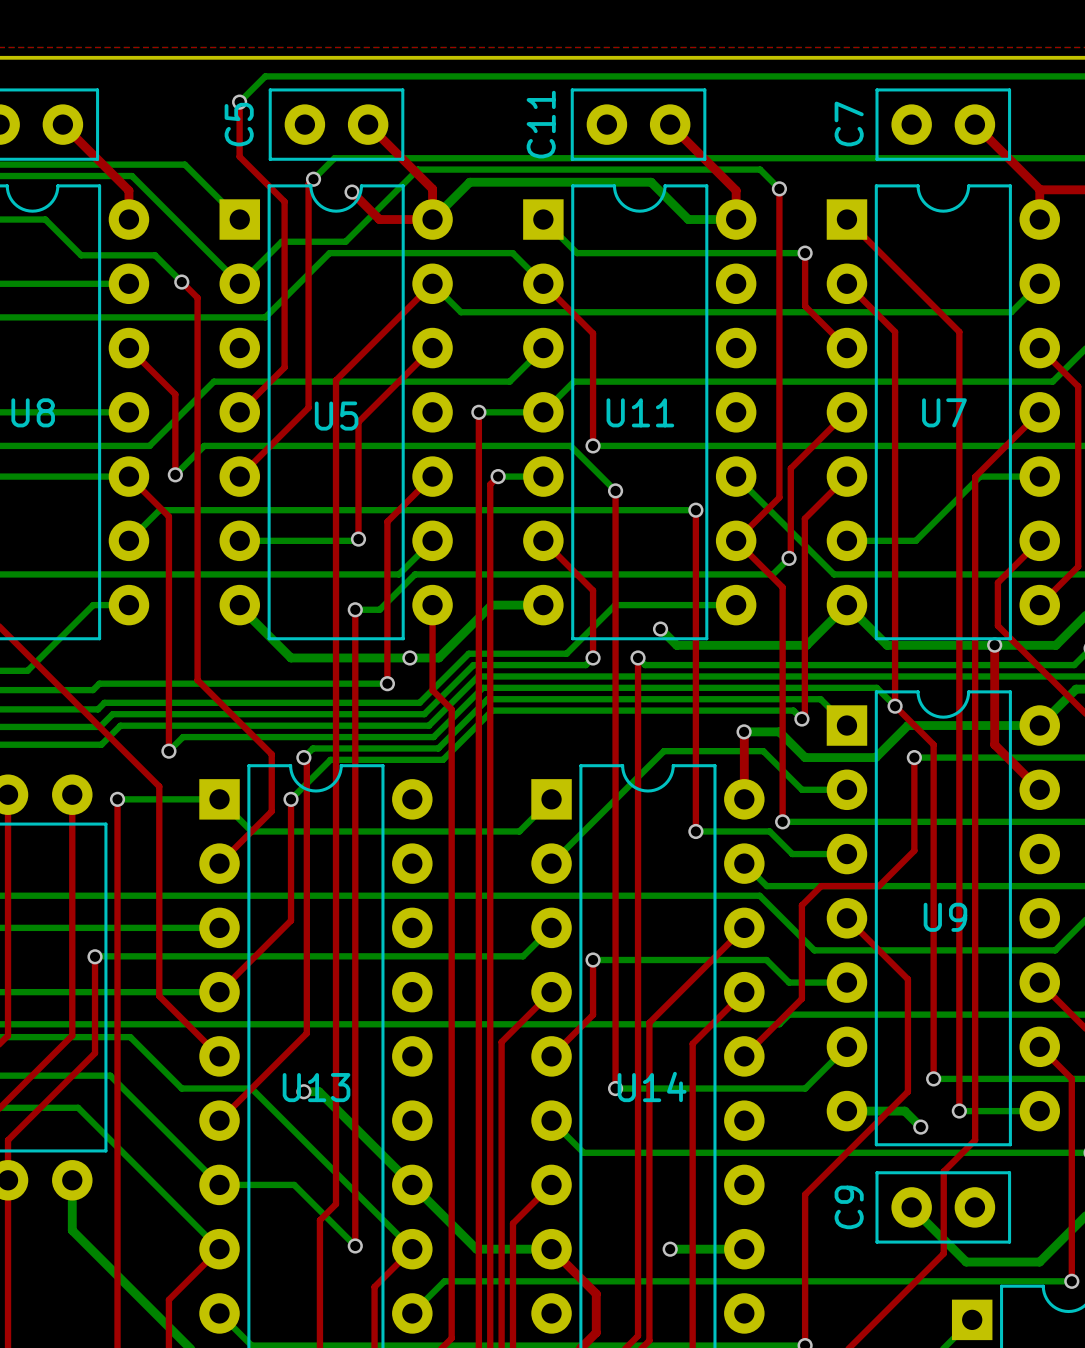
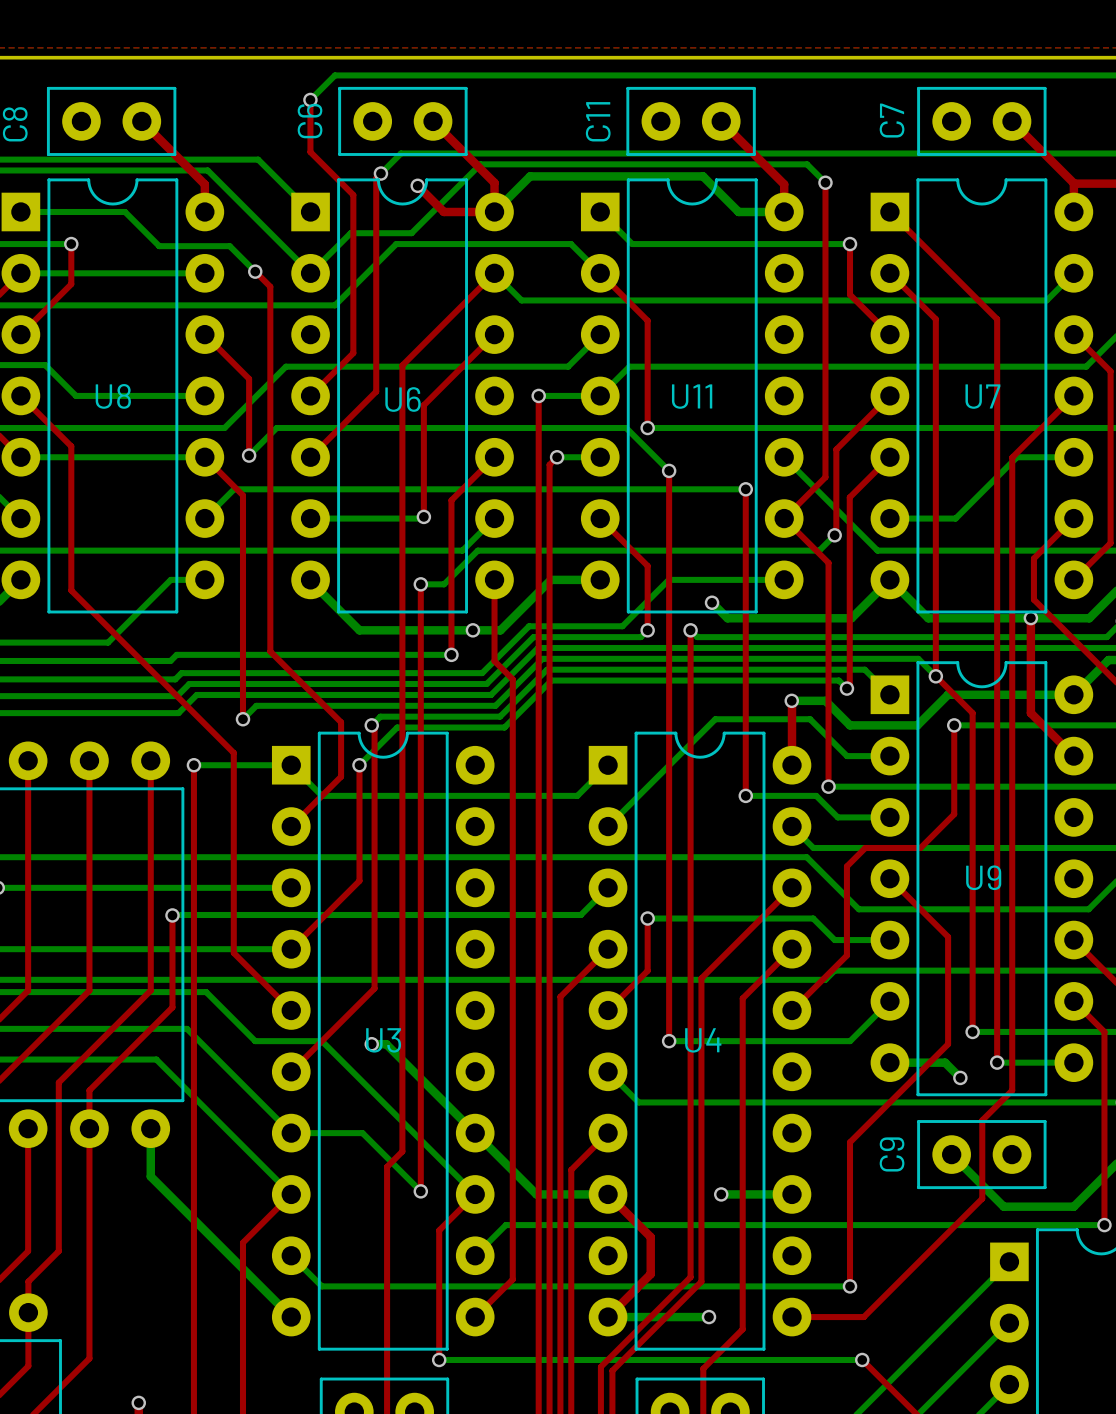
C5 name: C5 (239, 124) -> C6 (310, 121)
U5 name: U5 (336, 416) -> U6 (403, 399)
U14 name: U14 (652, 1086) -> U4 (703, 1040)
U13 name: U13 (316, 1087) -> U3 (383, 1040)

